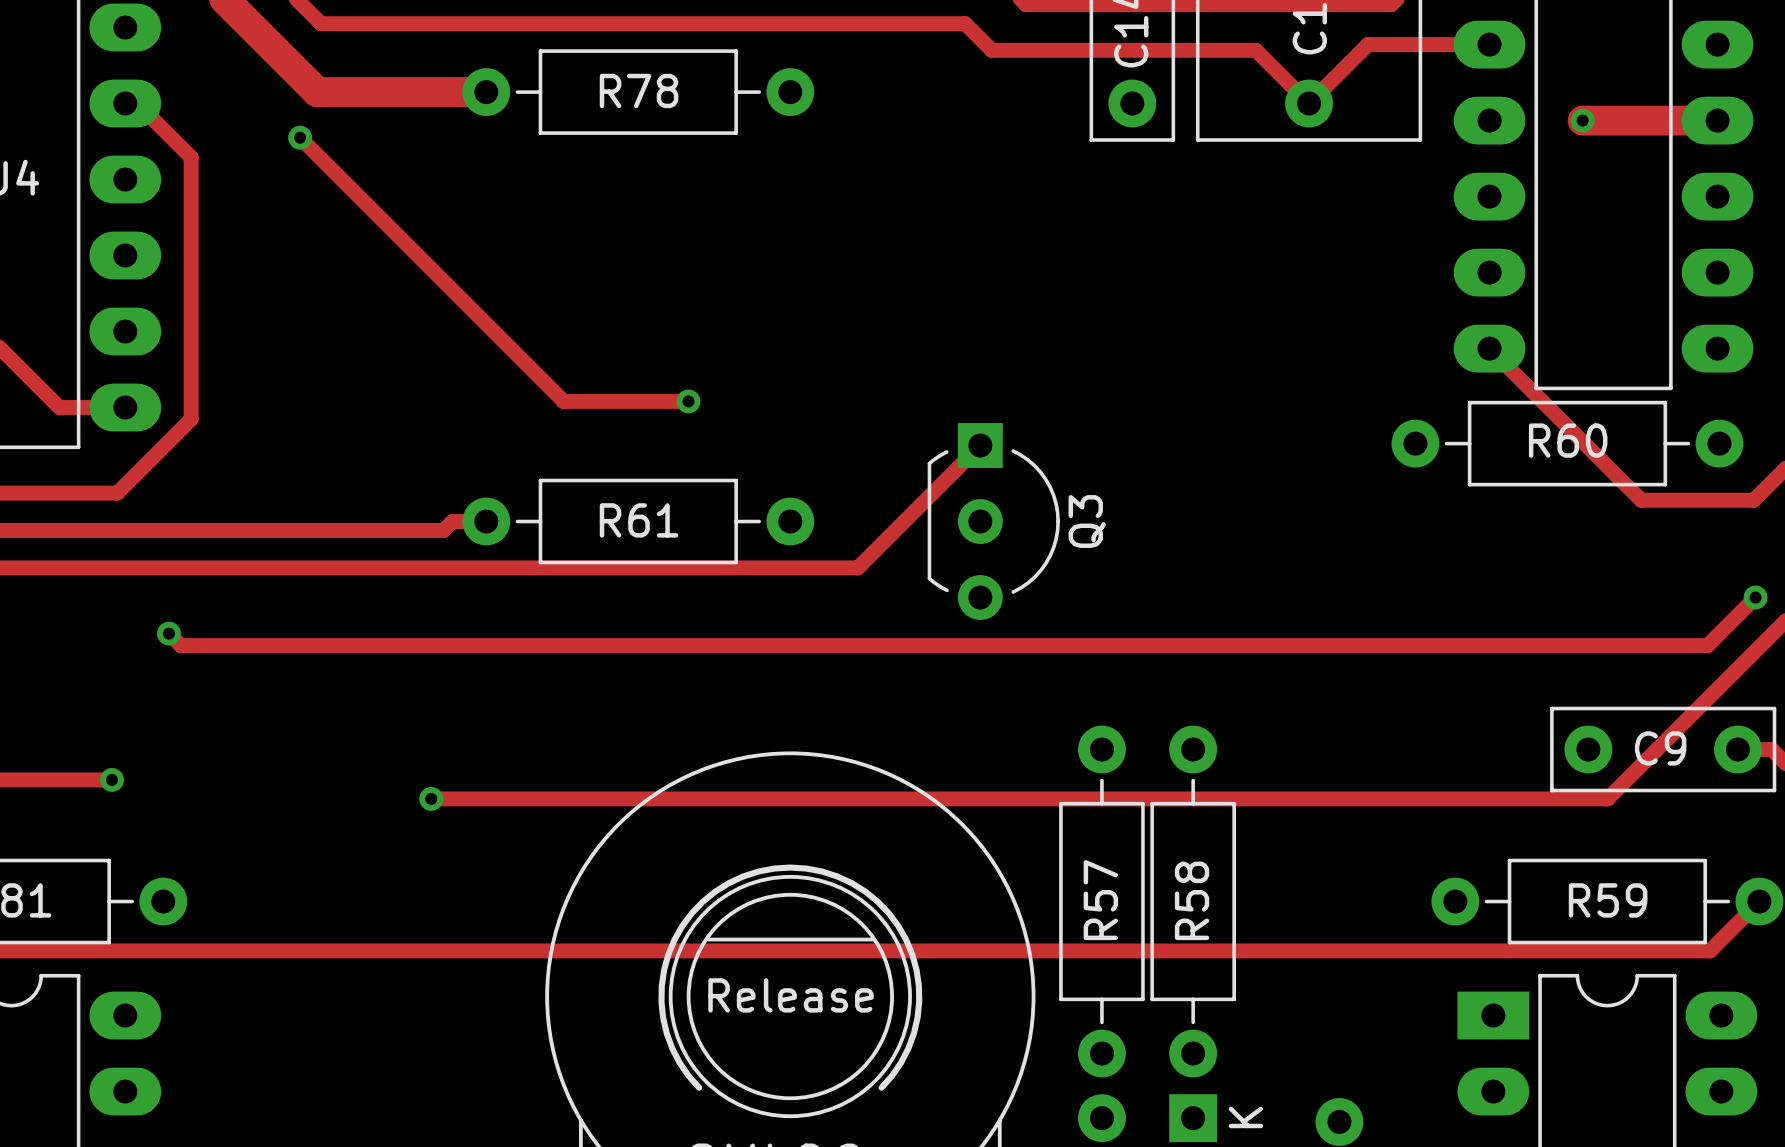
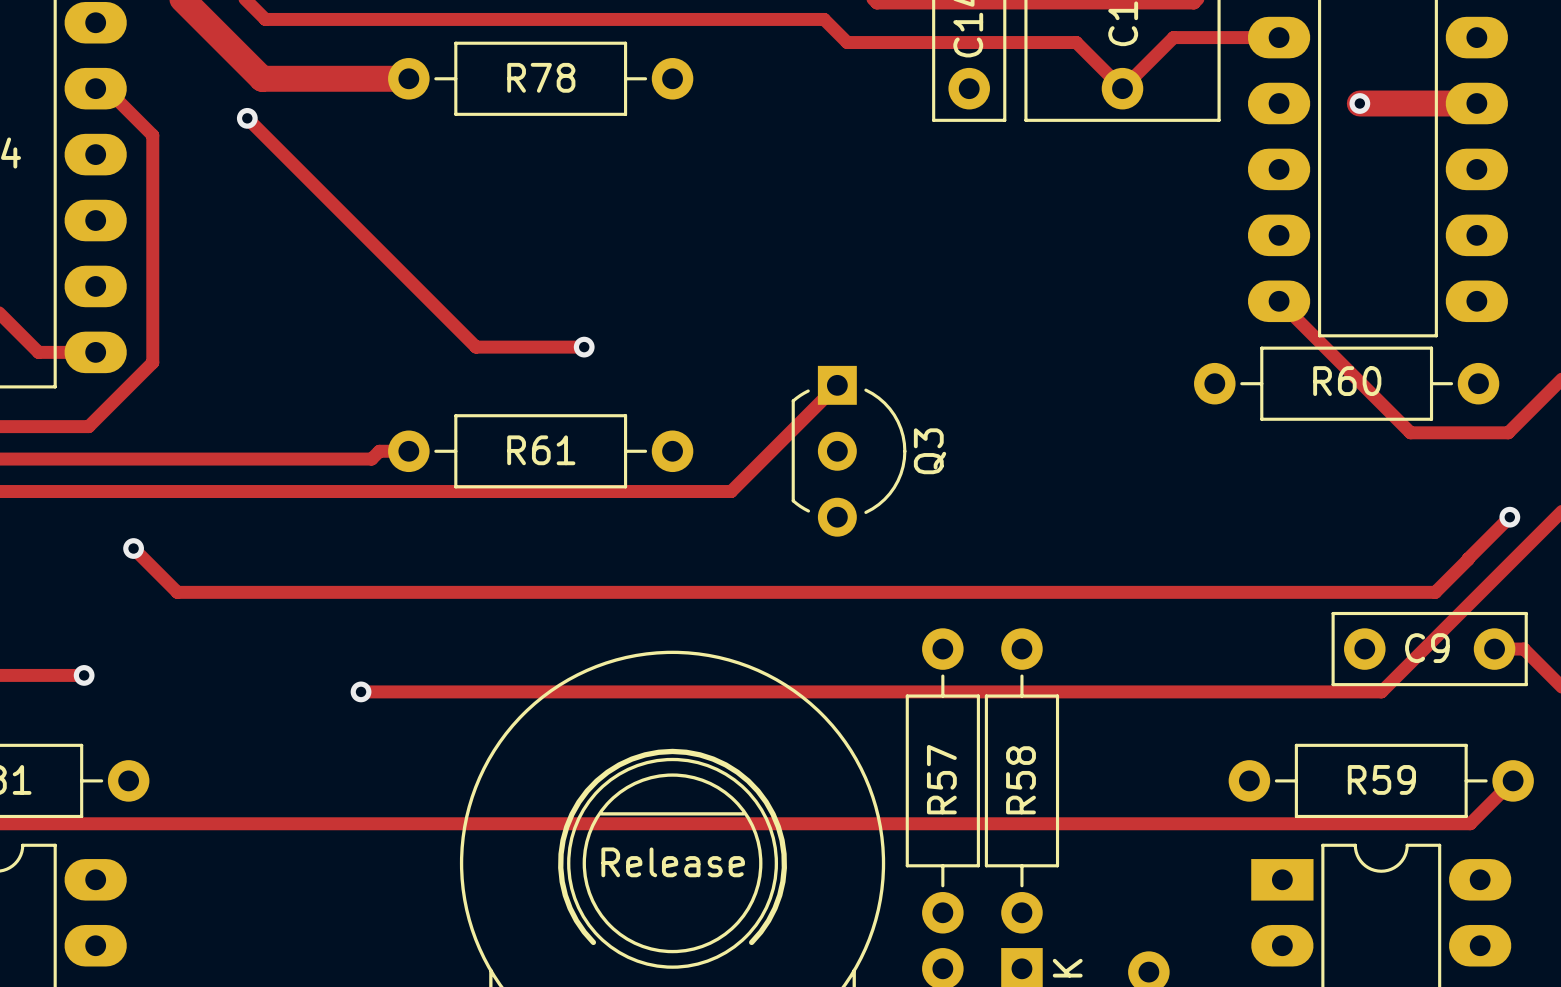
track: (180, 645) (1707, 645) -> (143, 558) (177, 592) (1435, 592) (1468, 558)

